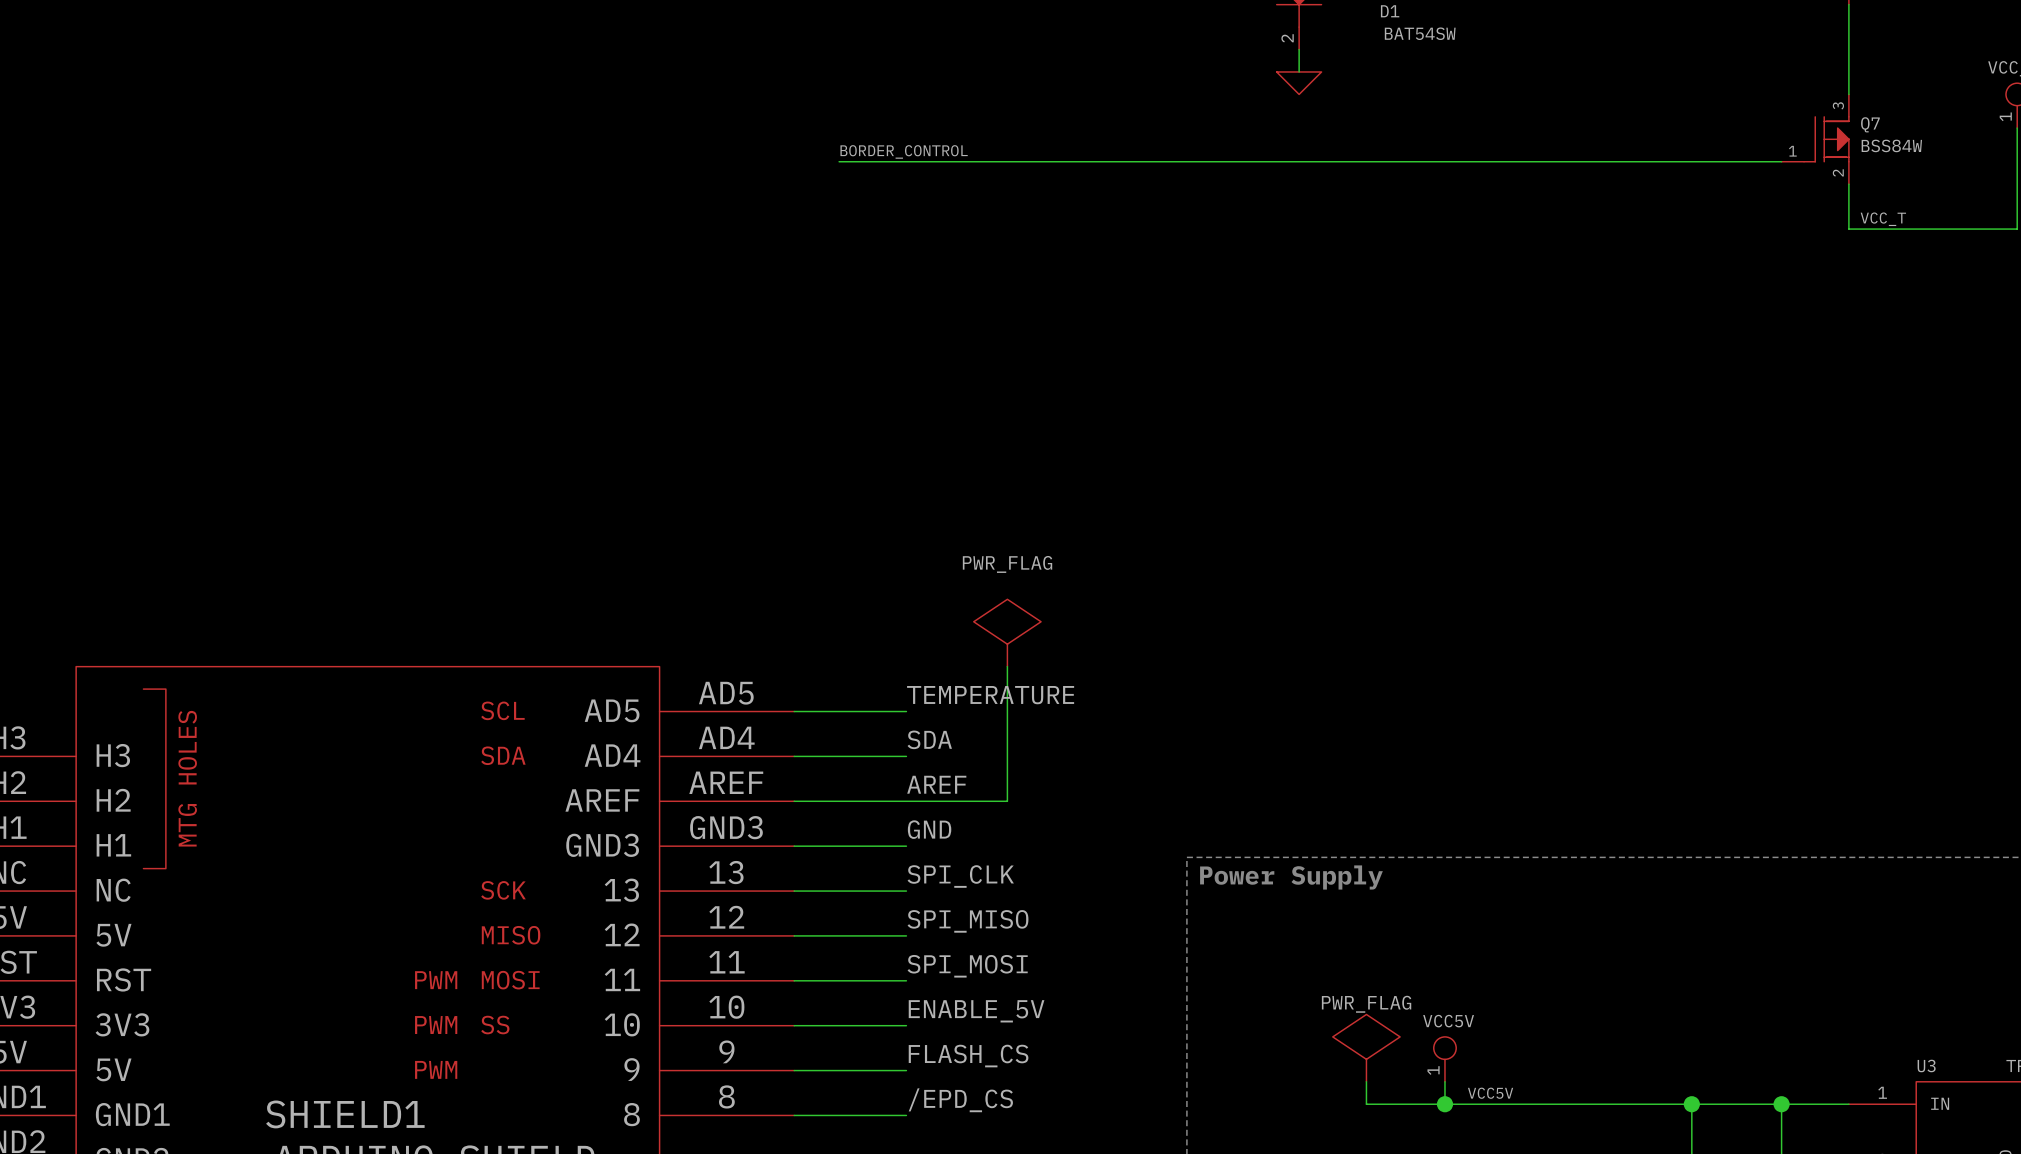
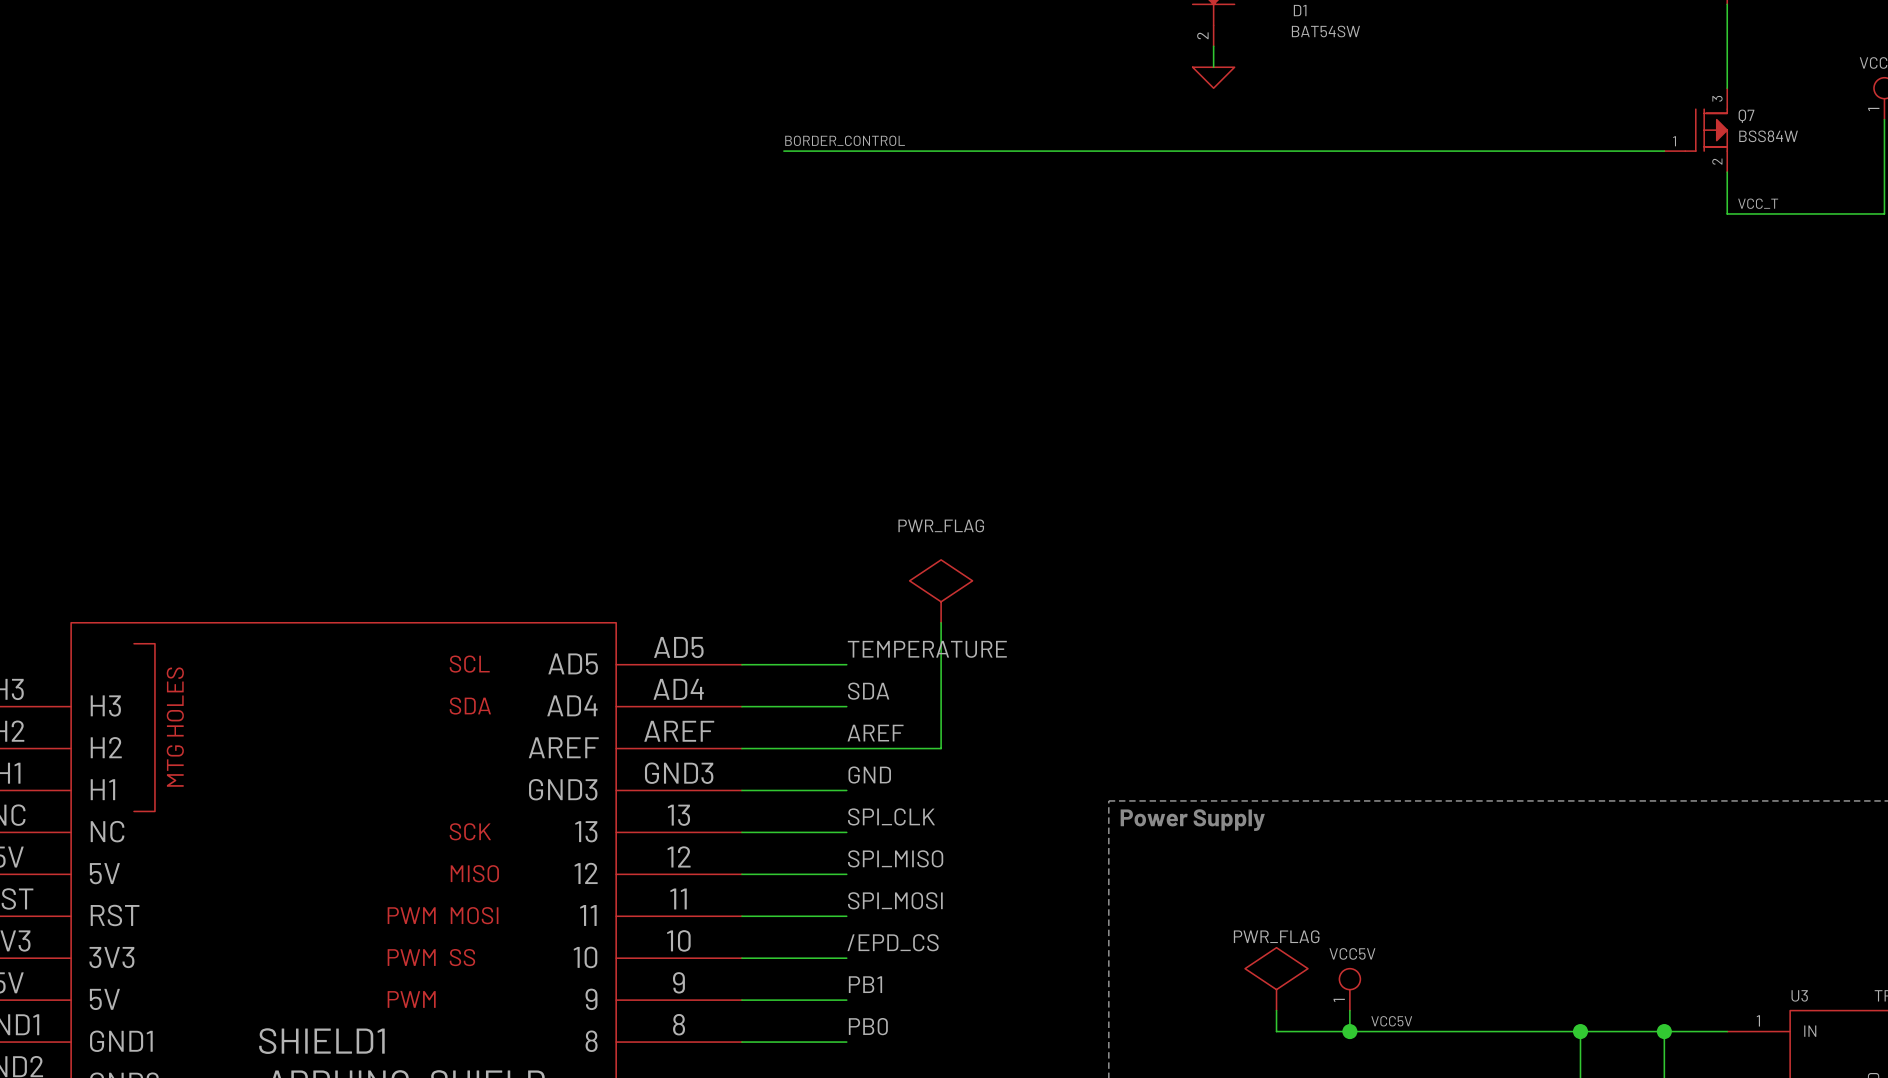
label: ENABLE_5V (976, 1011) -> /EPD_CS (893, 942)
label: FLASH_CS (968, 1056) -> PB1 (865, 984)
label: /EPD_CS (960, 1100) -> PB0 (868, 1026)

